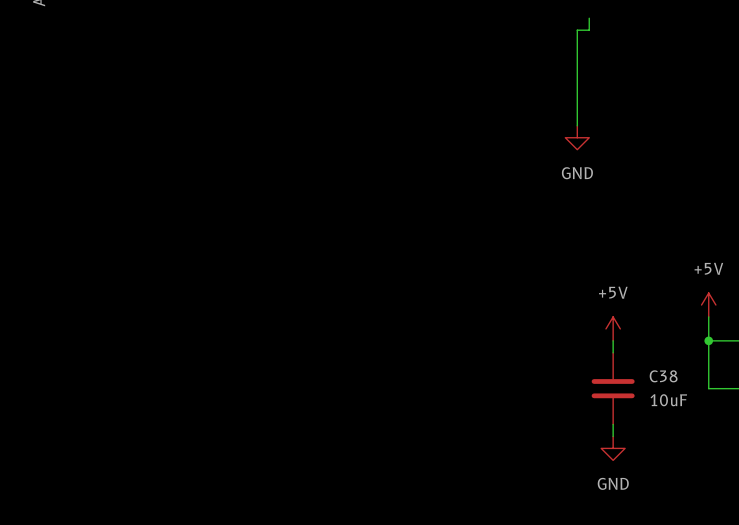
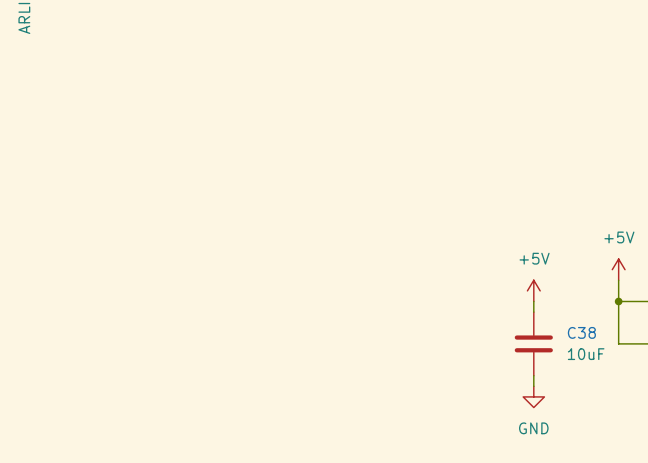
wire: (589, 18) (589, 30) (577, 30) (577, 125) -> none
power symbol: GND (577, 137) -> none

